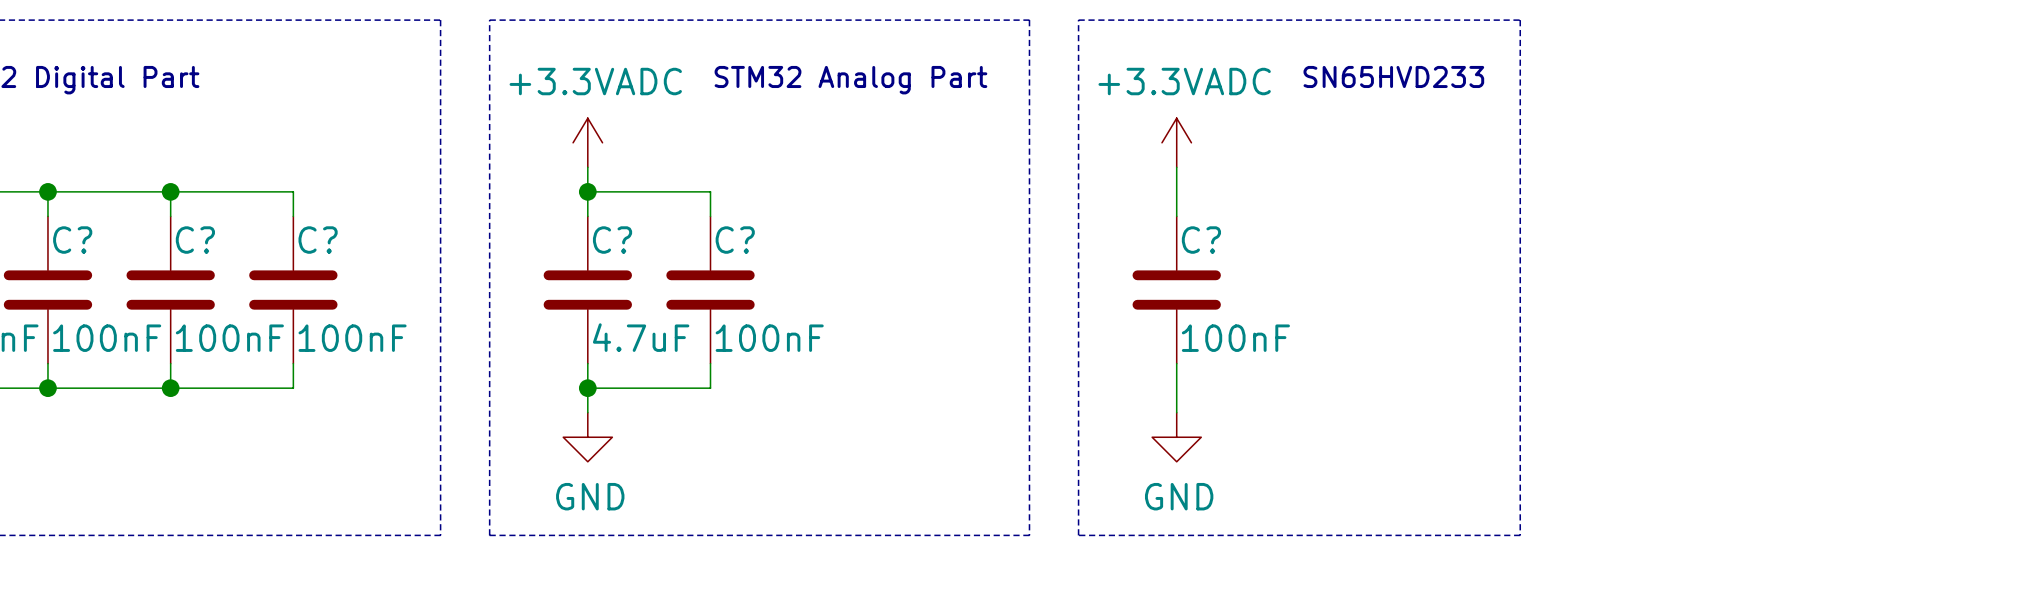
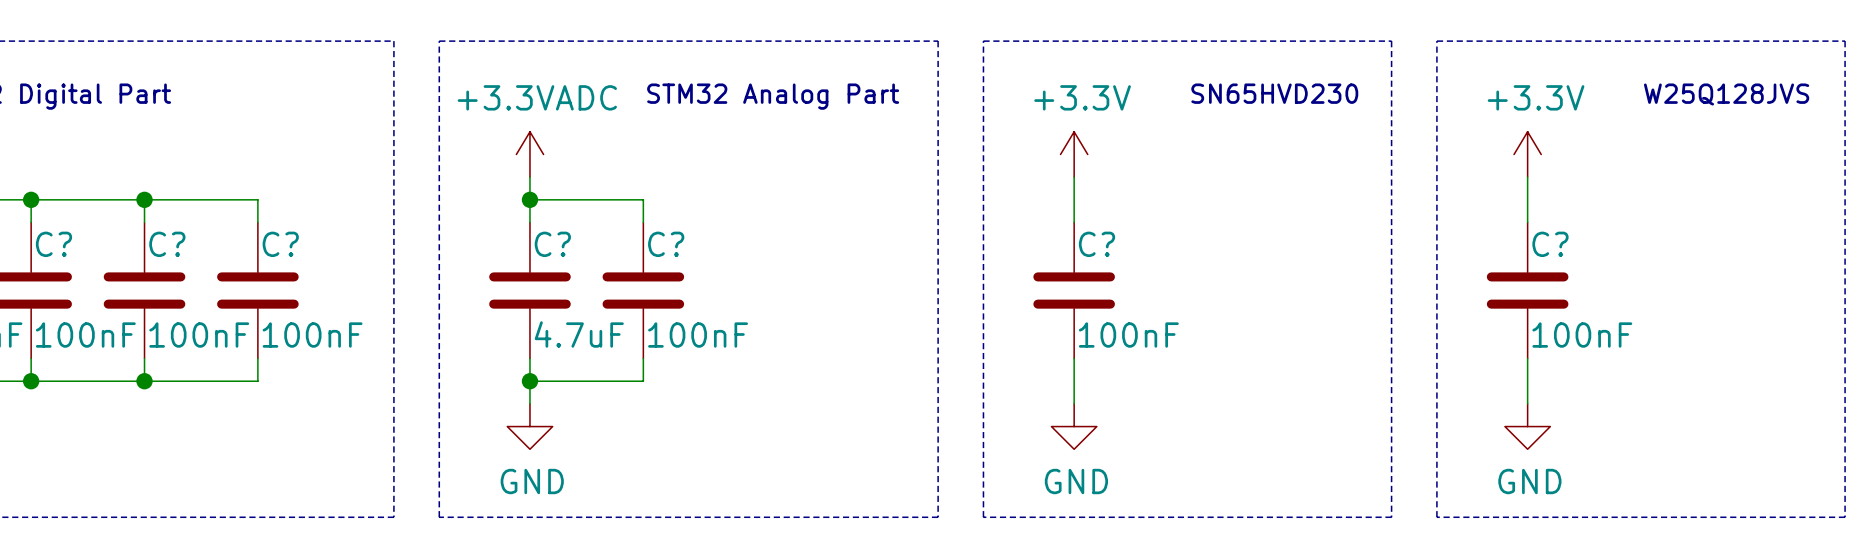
line: none -> (1436, 41) (1436, 517) (1845, 517) (1845, 41) (1436, 41)
text: SN65HVD233 (1393, 76) -> SN65HVD230 (1274, 93)
text: none -> W25Q128JVS (1726, 94)
power symbol: +3.3VADC (1176, 142) -> +3.3V (1074, 154)
power symbol: none -> +3.3V (1527, 154)
wire: none -> (1527, 177) (1527, 222)
C?: none -> 100nF (1527, 290)
wire: none -> (1527, 358) (1527, 403)
power symbol: none -> GND (1527, 426)

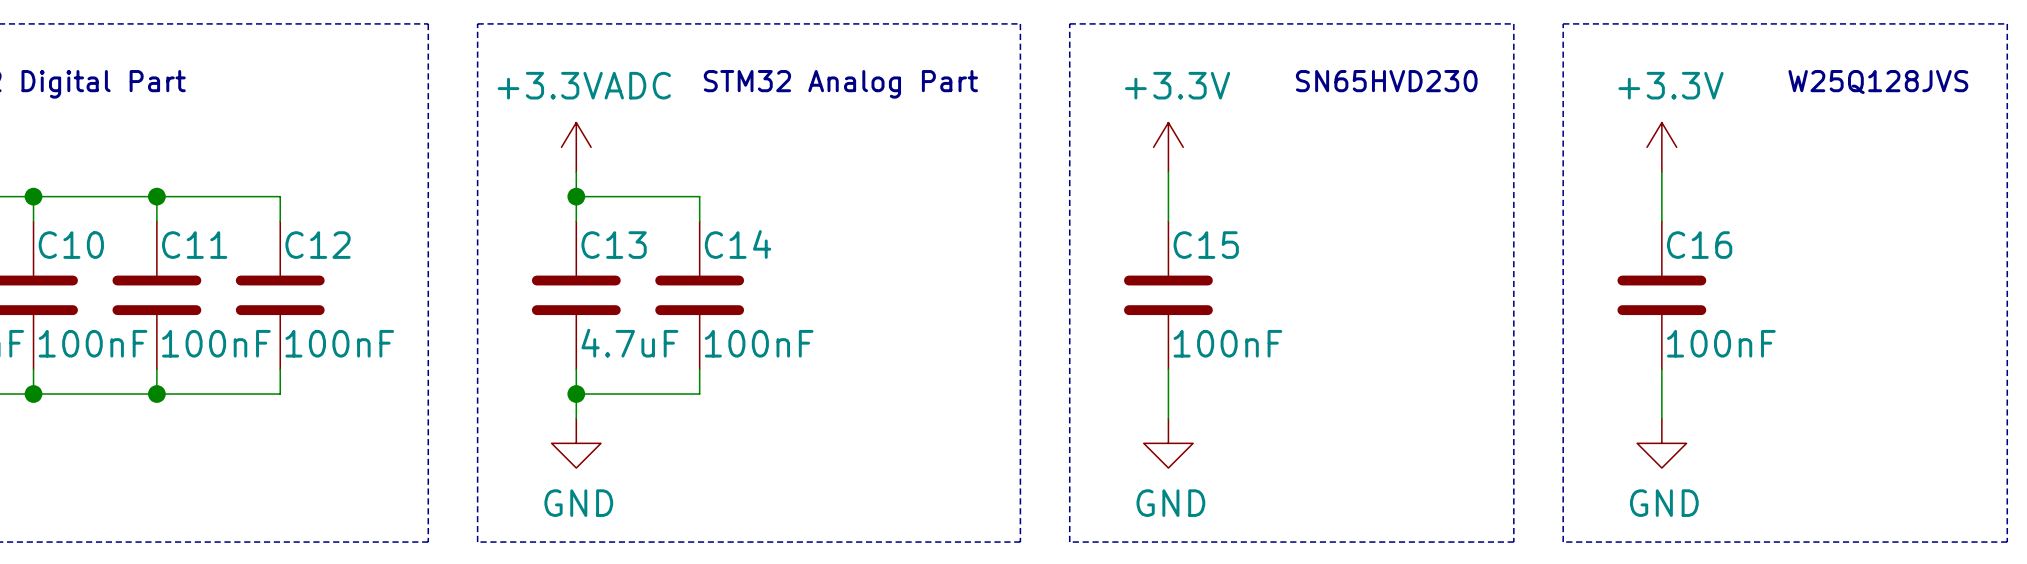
C? name: C? (53, 244) -> C10 (71, 245)
C? name: C? (167, 244) -> C11 (194, 245)
C? name: C? (280, 244) -> C12 (318, 245)
C? name: C? (552, 244) -> C13 (614, 245)
C? name: C? (666, 244) -> C14 (738, 244)
C? name: C? (1096, 244) -> C15 (1206, 245)
C? name: C? (1550, 244) -> C16 (1699, 245)

